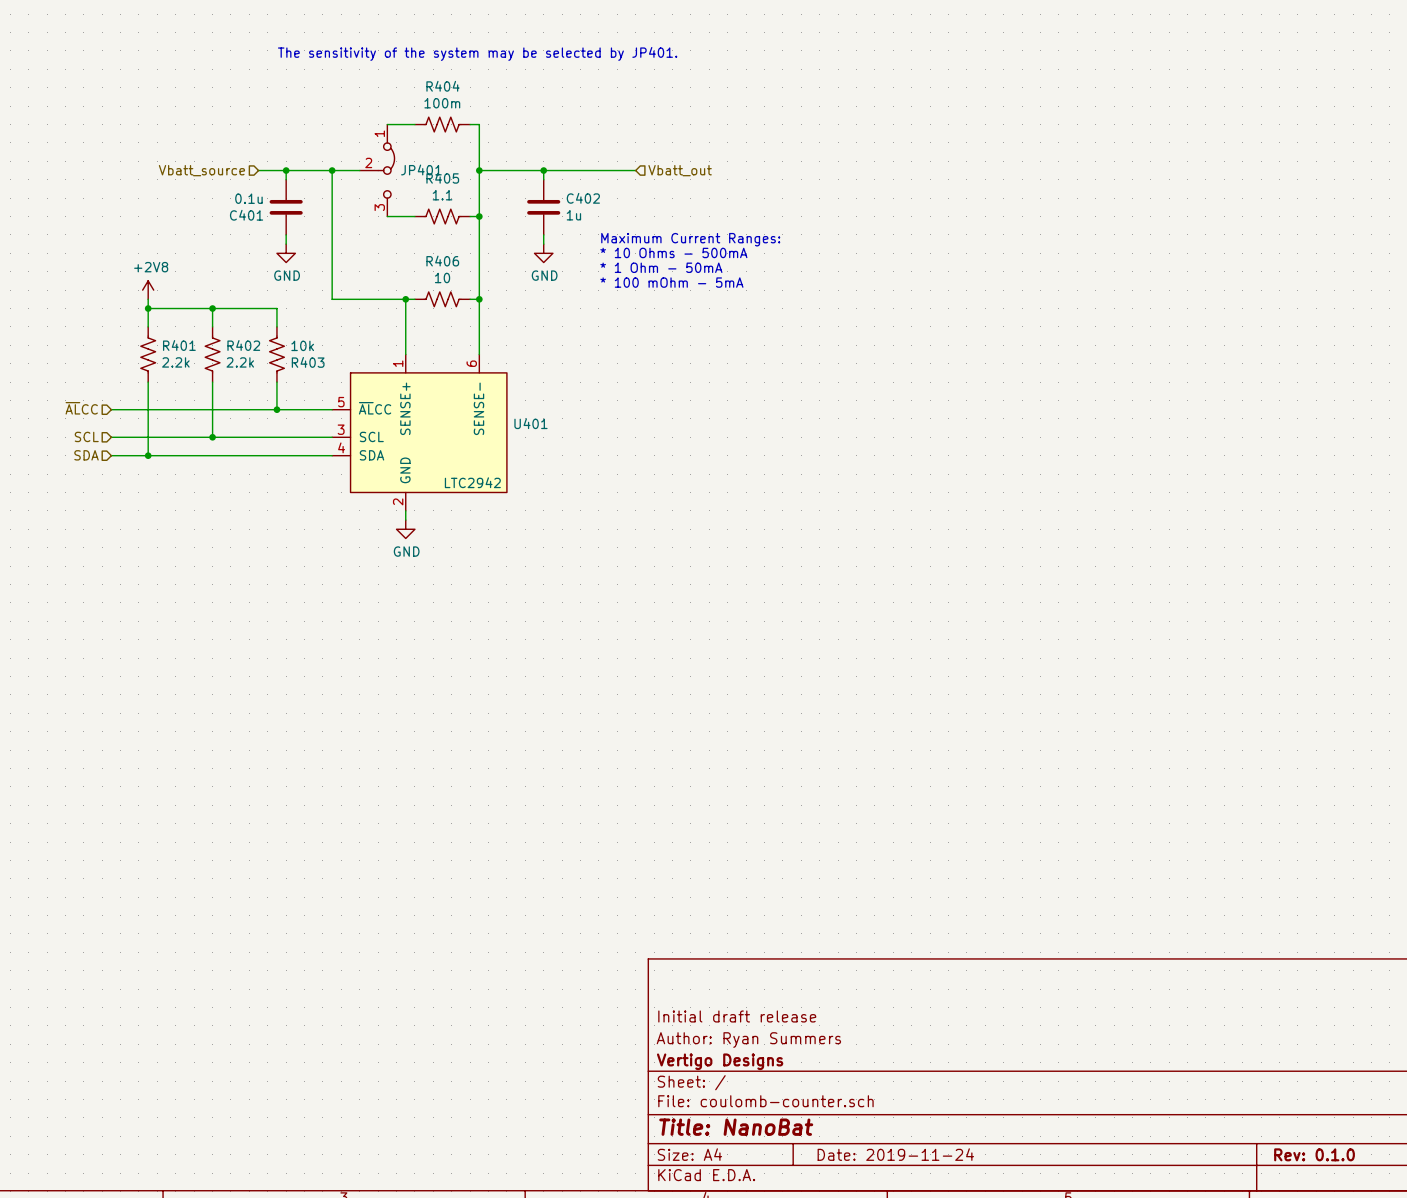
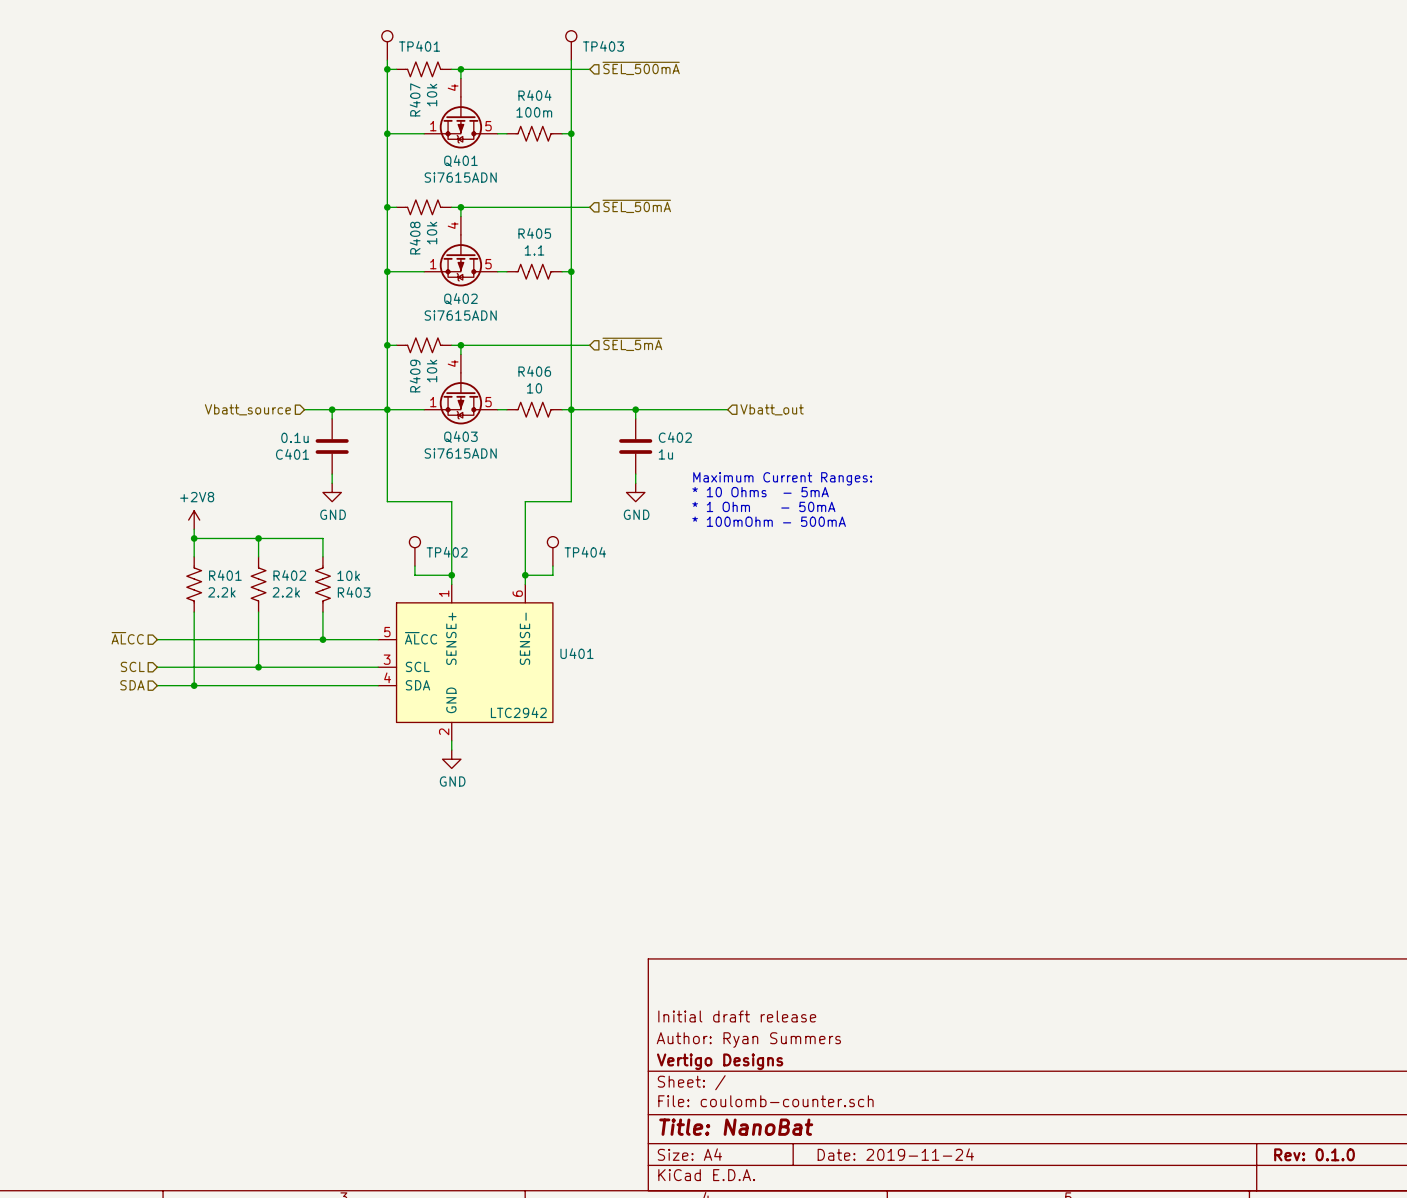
TP401: none -> (387, 45)
TP403: none -> (571, 45)
text: The sensitivity of the system may be selected by JP401. (477, 53) -> none
wire: none -> (387, 60) (387, 501) (451, 501) (451, 584)
wire: none -> (571, 60) (571, 501) (525, 501) (525, 584)
hierarchical label: none -> ~{SEL_500mA} (641, 68)
wire: none -> (387, 69) (396, 69)
junction: none -> (387, 69)
R407: none -> 10k (424, 69)
wire: none -> (451, 69) (589, 69)
junction: none -> (460, 69)
Q401: none -> Si7615ADN (460, 113)
wire: (387, 124) (414, 124) -> none
R404 position: (442, 124) -> (534, 133)
wire: (470, 124) (479, 124) (479, 354) -> none
wire: none -> (387, 133) (424, 133)
junction: none -> (387, 133)
wire: none -> (497, 133) (506, 133)
wire: none -> (562, 133) (571, 133)
junction: none -> (571, 133)
hierarchical label: Vbatt_source (201, 170) -> none
wire: (258, 170) (359, 170) -> none
wire: (286, 170) (286, 179) -> none
junction: (286, 170) -> none
wire: (332, 170) (332, 299) (414, 299) -> none
junction: (332, 170) -> none
JP401: (377, 170) -> none
wire: (479, 170) (635, 170) -> none
junction: (479, 170) -> none
wire: (543, 170) (543, 179) -> (460, 69) (460, 78)
junction: (543, 170) -> none
hierarchical label: Vbatt_out (680, 170) -> none
hierarchical label: none -> ~{SEL_50mA} (636, 206)
C401 position: (286, 207) -> (332, 446)
junction: none -> (387, 207)
R408: none -> 10k (424, 207)
wire: none -> (451, 207) (589, 207)
junction: none -> (460, 207)
C402 position: (543, 207) -> (635, 446)
wire: (387, 216) (414, 216) -> none
R405 position: (442, 216) -> (534, 271)
wire: (470, 216) (479, 216) -> (387, 207) (396, 207)
junction: (479, 216) -> none
wire: (286, 234) (286, 244) -> none
wire: (543, 234) (543, 244) -> (460, 207) (460, 216)
text: Maximum Current Ranges: (690, 239) -> none
Q402: none -> Si7615ADN (460, 251)
text: * 10 Ohms - 500mA (673, 252) -> none
power symbol: GND (286, 253) -> none
power symbol: GND (543, 253) -> none
text: * 1 Ohm - 50mA (661, 267) -> none
wire: none -> (387, 271) (424, 271)
junction: none -> (387, 271)
wire: none -> (562, 271) (571, 271)
junction: none -> (571, 271)
text: * 100 mOhm - 5mA (671, 282) -> none
power symbol: +2V8 (148, 290) -> none
wire: (148, 299) (148, 326) -> none
wire: (405, 299) (405, 354) -> none
junction: (405, 299) -> none
R406 position: (442, 299) -> (534, 409)
wire: (470, 299) (479, 299) -> (497, 271) (506, 271)
junction: (479, 299) -> none
wire: (148, 308) (276, 308) (276, 326) -> none
junction: (148, 308) -> none
wire: (212, 308) (212, 326) -> none
junction: (212, 308) -> none
hierarchical label: none -> ~{SEL_5mA} (632, 344)
wire: none -> (387, 345) (396, 345)
junction: none -> (387, 345)
R409: none -> 10k (424, 345)
wire: none -> (451, 345) (589, 345)
wire: none -> (460, 345) (460, 354)
junction: none -> (460, 345)
R401 position: (148, 354) -> (194, 584)
R402 position: (212, 354) -> (258, 584)
R403 position: (276, 354) -> (322, 584)
wire: (148, 382) (148, 455) -> none
wire: (212, 382) (212, 437) -> none
wire: (276, 382) (276, 409) -> (194, 529) (194, 556)
Q403: none -> Si7615ADN (460, 389)
hierarchical label: ~{AL}CC (81, 408) -> none
wire: (111, 409) (304, 409) -> none
hierarchical label: none -> Vbatt_source (247, 409)
junction: (276, 409) -> none
junction: none -> (332, 409)
junction: none -> (387, 409)
wire: none -> (562, 409) (727, 409)
junction: none -> (571, 409)
wire: none -> (635, 409) (635, 418)
junction: none -> (635, 409)
hierarchical label: none -> Vbatt_out (772, 409)
U401 position: (419, 432) -> (465, 662)
hierarchical label: SCL (86, 436) -> none
wire: (111, 437) (332, 437) -> none
junction: (212, 437) -> none
hierarchical label: SDA (86, 455) -> none
wire: (111, 455) (332, 455) -> none
junction: (148, 455) -> none
wire: none -> (635, 474) (635, 483)
text: none -> Maximum Current Ranges: (782, 478)
power symbol: none -> GND (635, 492)
text: none -> * 10 Ohms - 5mA (760, 492)
text: none -> * 1 Ohm - 50mA (763, 506)
wire: (405, 510) (405, 520) -> (332, 474) (332, 483)
power symbol: none -> +2V8 (194, 520)
text: none -> * 100mOhm - 500mA (769, 521)
power symbol position: GND (405, 529) -> GND (332, 492)
wire: none -> (194, 538) (322, 538) (322, 556)
junction: none -> (194, 538)
wire: none -> (258, 538) (258, 556)
junction: none -> (258, 538)
TP402: none -> (414, 551)
TP404: none -> (552, 551)
wire: none -> (414, 566) (414, 575) (451, 575)
wire: none -> (552, 566) (552, 575) (525, 575)
junction: none -> (451, 575)
junction: none -> (525, 575)
wire: none -> (194, 612) (194, 685)
wire: none -> (258, 612) (258, 667)
wire: none -> (322, 612) (322, 639)
hierarchical label: none -> ~{AL}CC (127, 638)
wire: none -> (157, 639) (378, 639)
junction: none -> (322, 639)
hierarchical label: none -> SCL (132, 666)
wire: none -> (157, 667) (378, 667)
junction: none -> (258, 667)
hierarchical label: none -> SDA (132, 685)
wire: none -> (157, 685) (378, 685)
junction: none -> (194, 685)
wire: none -> (451, 740) (451, 750)
power symbol: none -> GND (451, 759)

